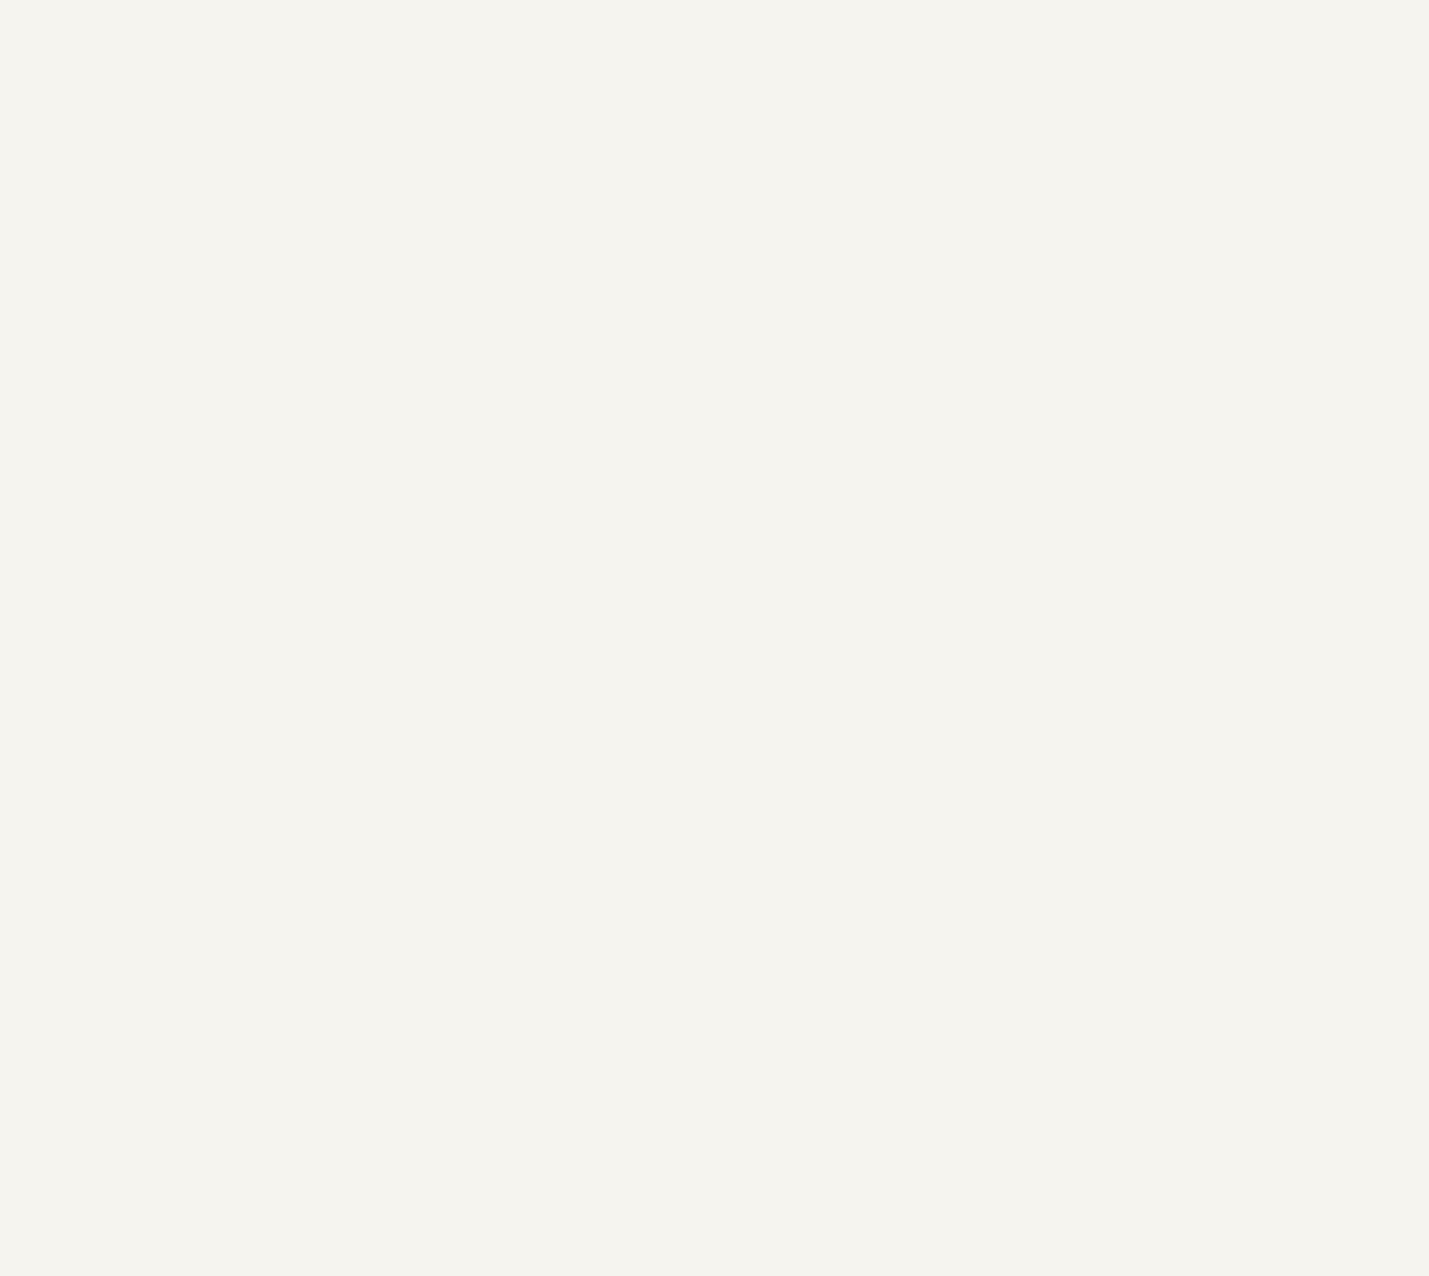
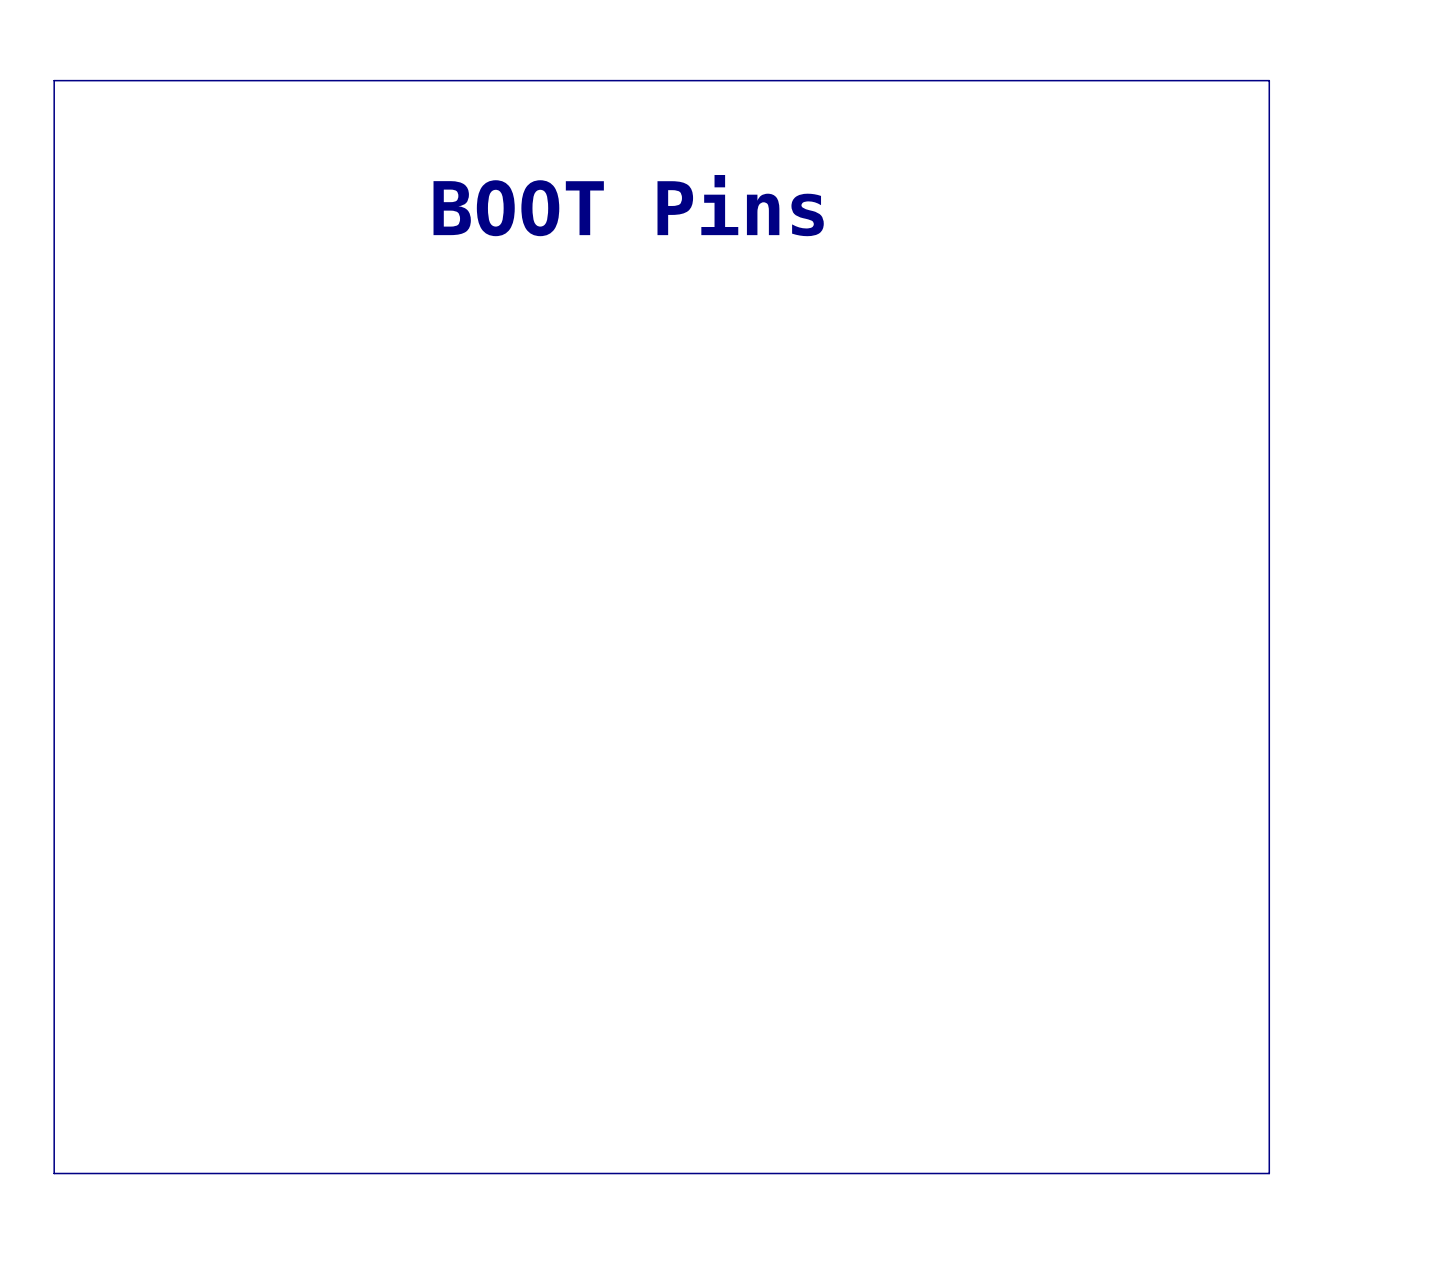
line: none -> (54, 80) (1269, 80) (1269, 1173) (54, 1173) (54, 80)
text: none -> BOOT Pins (628, 205)

